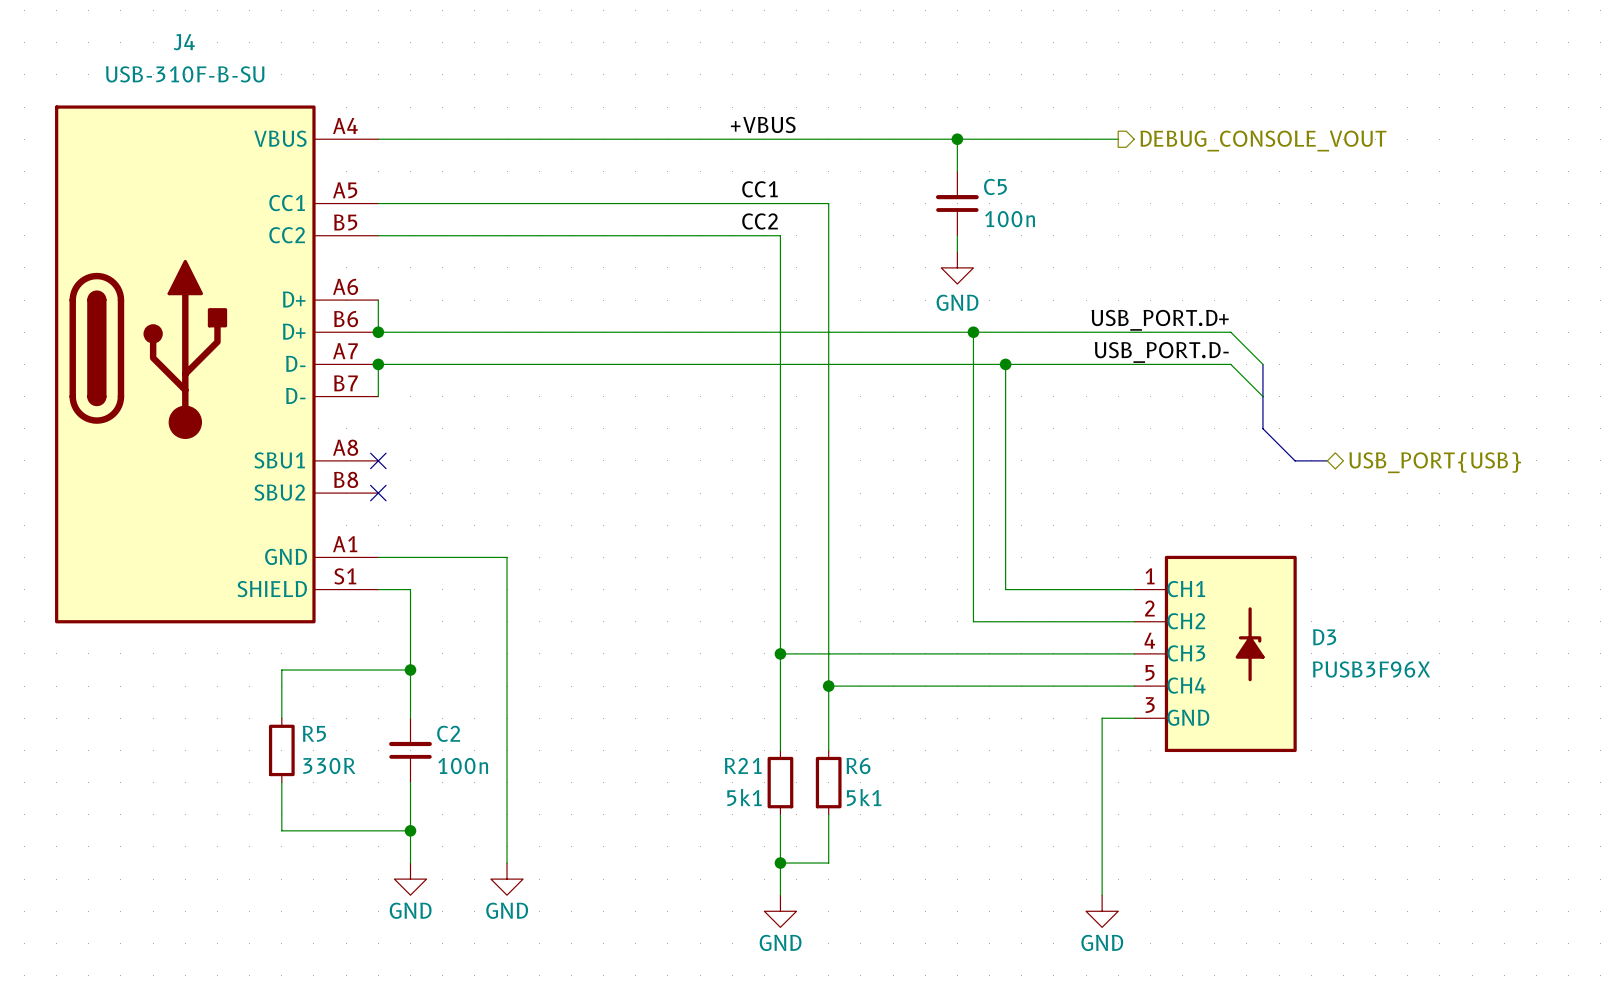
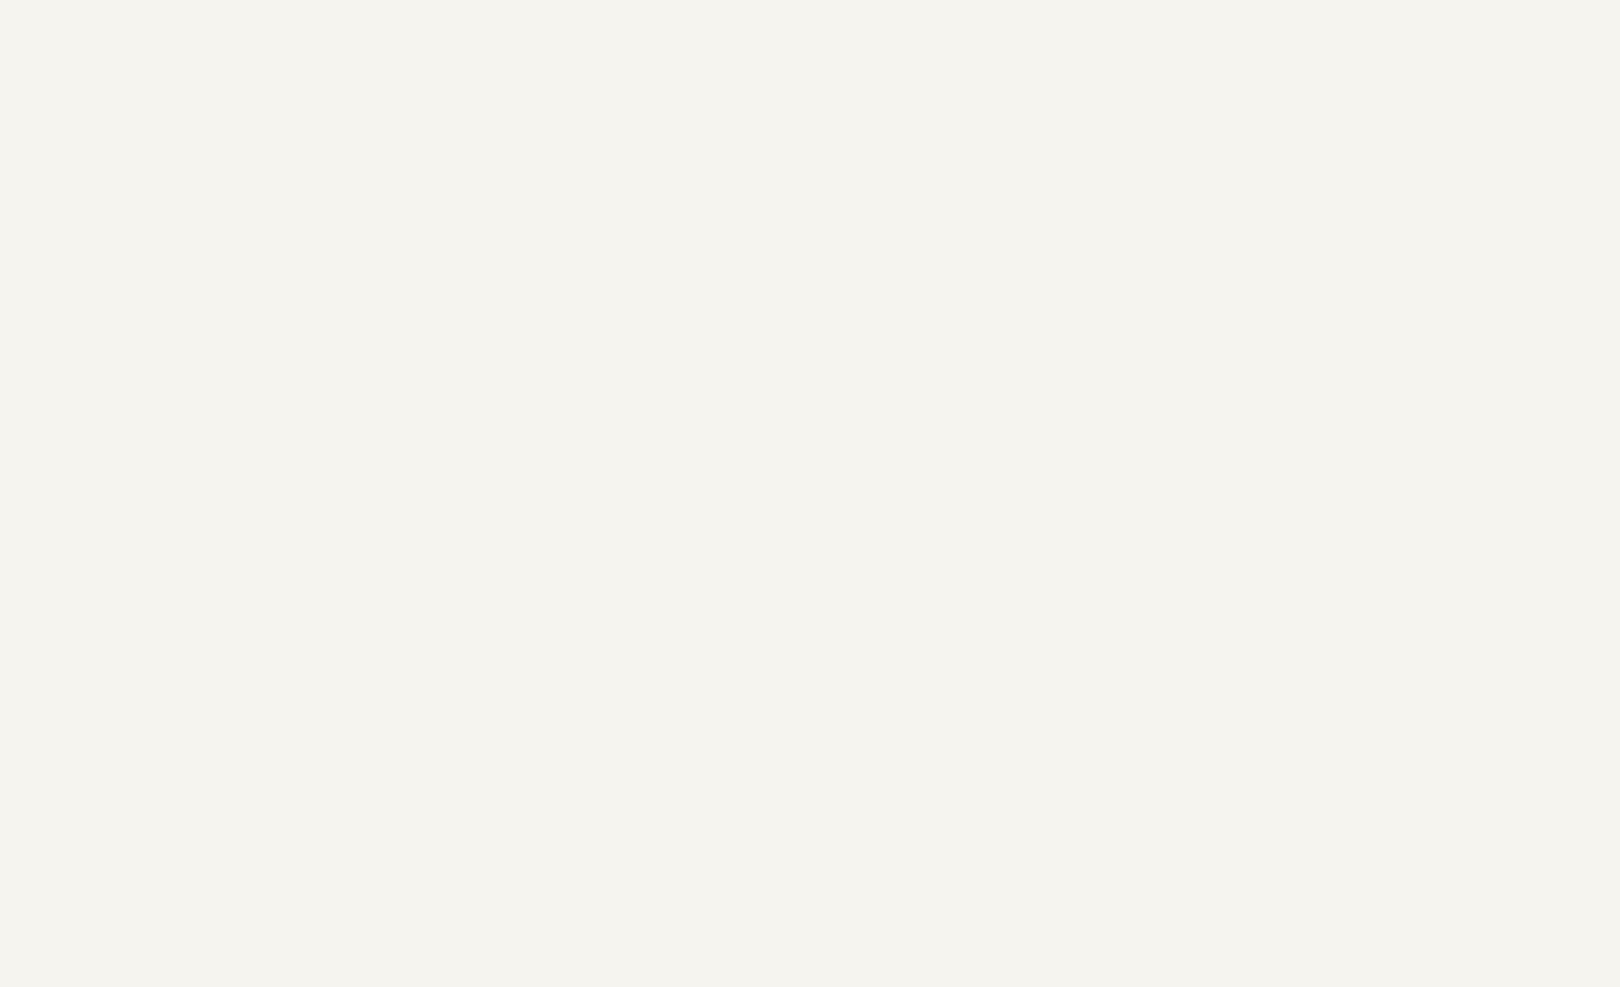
label: +VBUS (763, 124) -> none
wire: (378, 139) (1118, 139) -> none
wire: (957, 139) (957, 171) -> none
junction: (957, 139) -> none
hierarchical label: DEBUG_CONSOLE_VOUT (1263, 141) -> none
label: CC1 (760, 189) -> none
wire: (378, 203) (828, 203) (828, 750) -> none
C5: (957, 203) -> none
label: CC2 (760, 221) -> none
wire: (378, 235) (780, 235) (780, 750) -> none
wire: (957, 235) (957, 251) -> none
power symbol: GND (957, 267) -> none
wire: (378, 300) (378, 332) (1230, 332) (1262, 364) -> none
label: USB_PORT.D+ (1160, 320) -> none
junction: (378, 332) -> none
wire: (973, 332) (973, 621) (1134, 621) -> none
junction: (973, 332) -> none
label: USB_PORT.D- (1161, 352) -> none
J4: (216, 364) -> none
junction: (378, 364) -> none
wire: (1005, 364) (1005, 589) (1134, 589) -> none
junction: (1005, 364) -> none
bus: (1262, 364) (1262, 428) (1295, 460) (1327, 460) -> none
wire: (378, 396) (378, 364) (1230, 364) (1262, 396) -> none
no-connect mark: (378, 460) -> none
hierarchical label: USB_PORT{USB} (1435, 462) -> none
no-connect mark: (378, 493) -> none
wire: (378, 557) (507, 557) (507, 863) -> none
wire: (378, 589) (410, 589) (410, 718) -> none
wire: (780, 653) (1134, 653) -> none
junction: (780, 653) -> none
D3: PUSB3F96X (1215, 653) -> none
wire: (410, 670) (281, 670) (281, 718) -> none
junction: (410, 670) -> none
wire: (828, 686) (1134, 686) -> none
junction: (828, 686) -> none
wire: (1134, 718) (1102, 718) (1102, 895) -> none
R5: (281, 750) -> none
C2: (410, 750) -> none
wire: (281, 782) (281, 830) (410, 830) -> none
wire: (410, 782) (410, 863) -> none
R21: (780, 782) -> none
R6: (828, 782) -> none
wire: (780, 814) (780, 895) -> none
wire: (828, 814) (828, 863) (780, 863) -> none
junction: (410, 830) -> none
junction: (780, 863) -> none
power symbol: GND (410, 879) -> none
power symbol: GND (507, 879) -> none
power symbol: GND (780, 911) -> none
power symbol: GND (1102, 911) -> none

